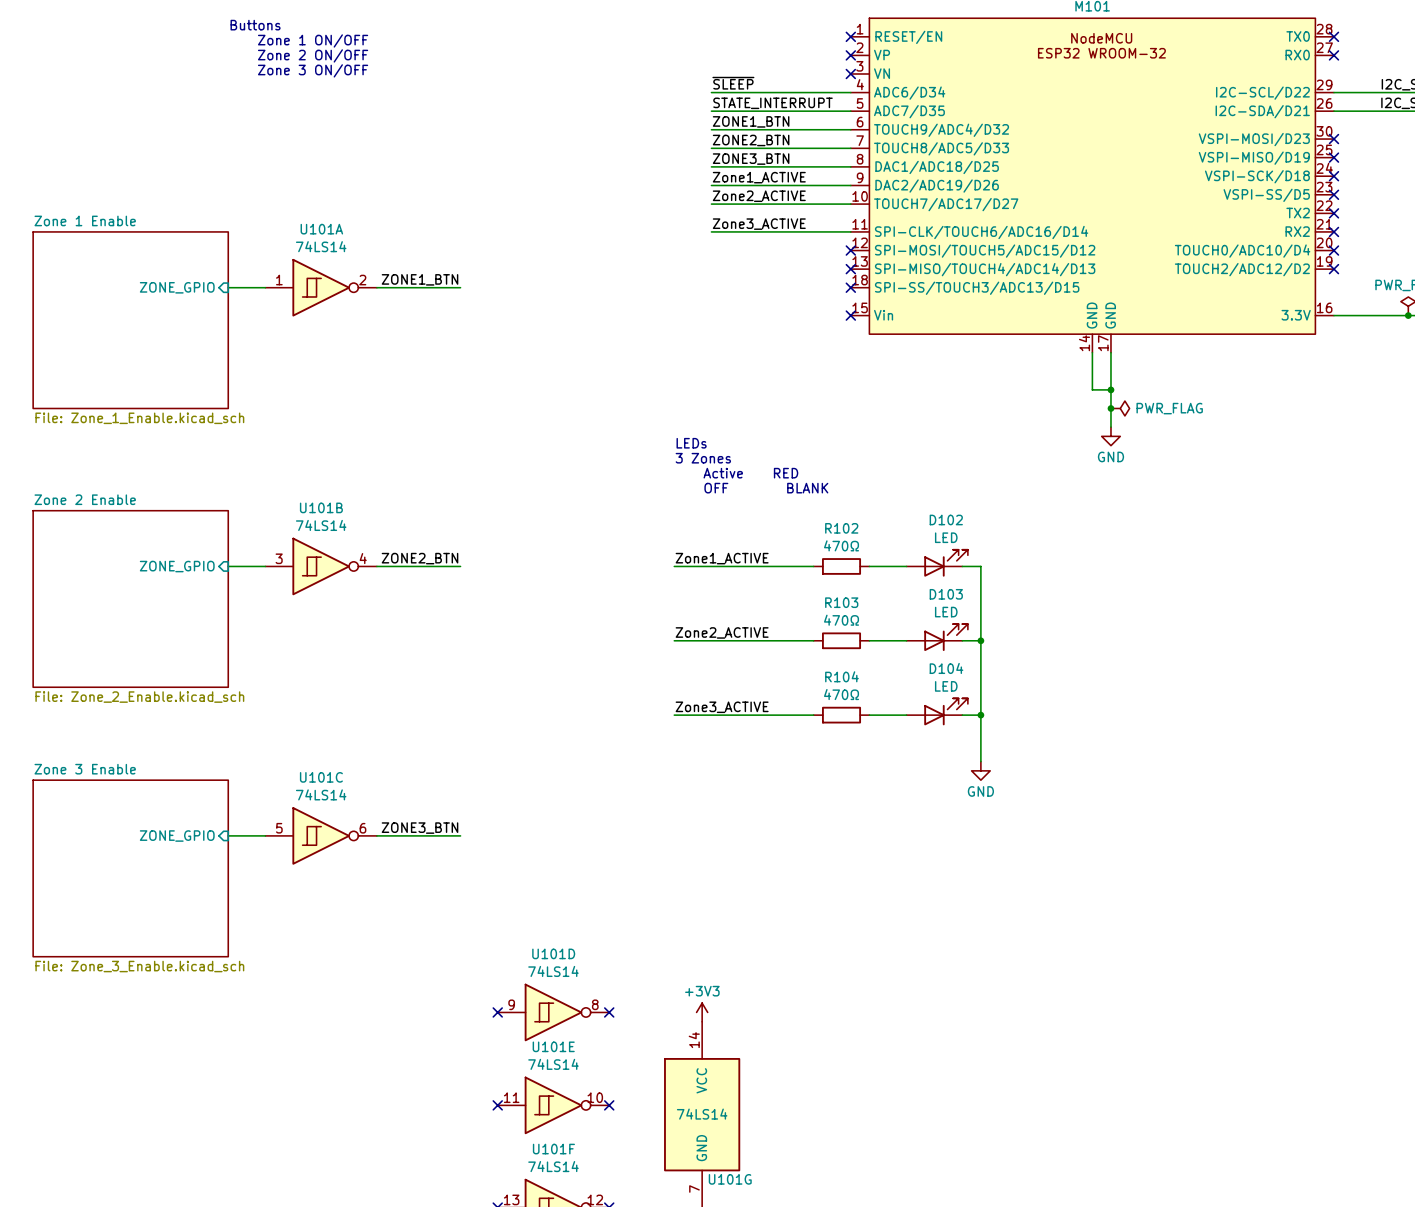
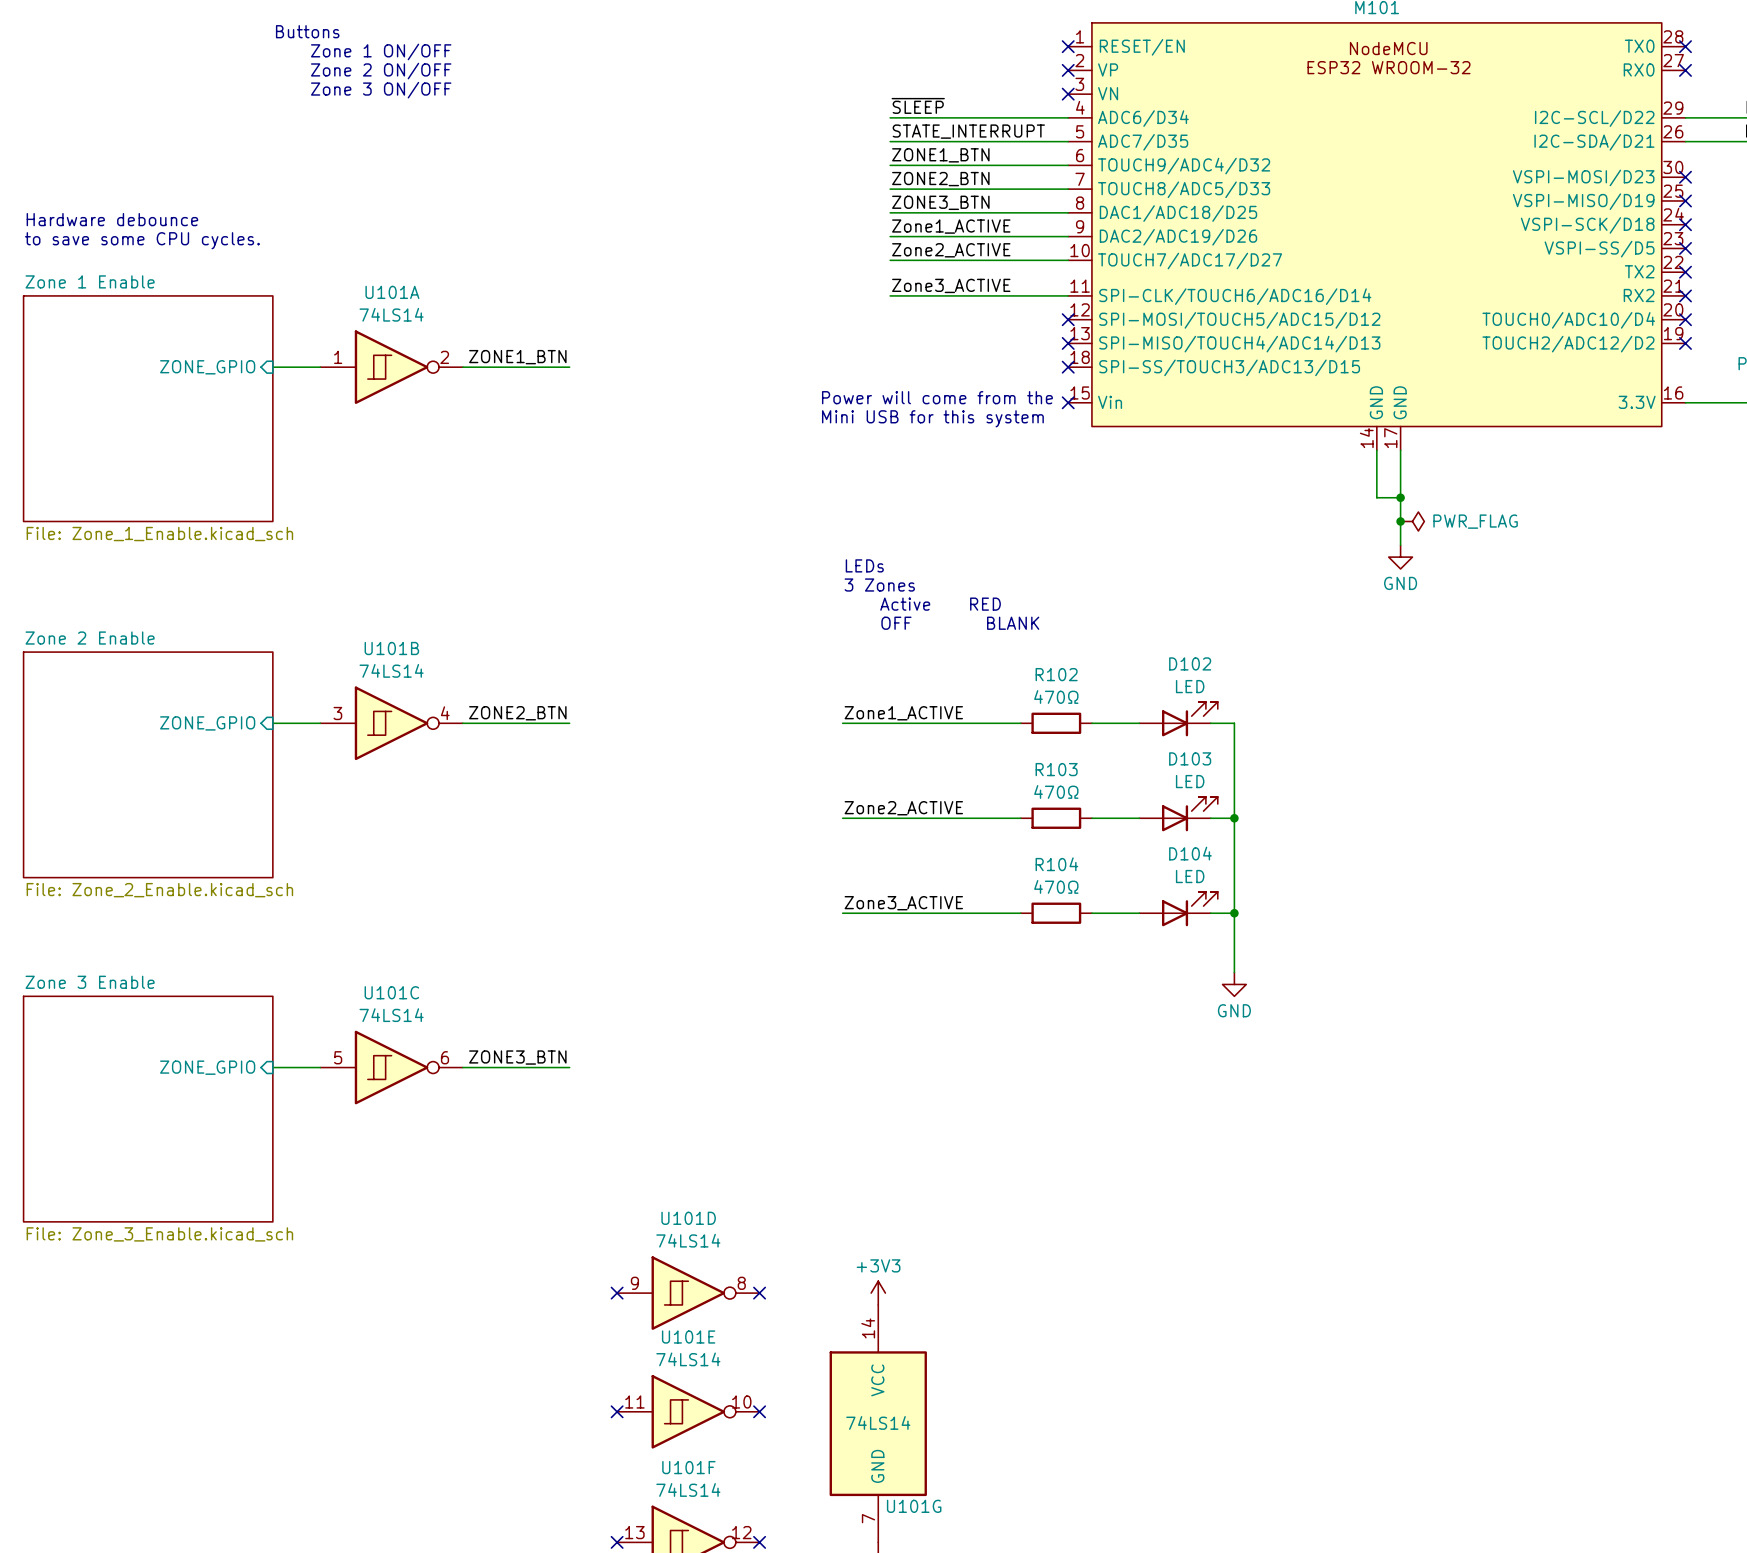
text: none -> Hardware debounce (112, 219)
text: none -> to save some CPU cycles. (142, 240)
text: none -> Power will come from the (937, 397)
text: none -> Mini USB for this system (932, 418)

